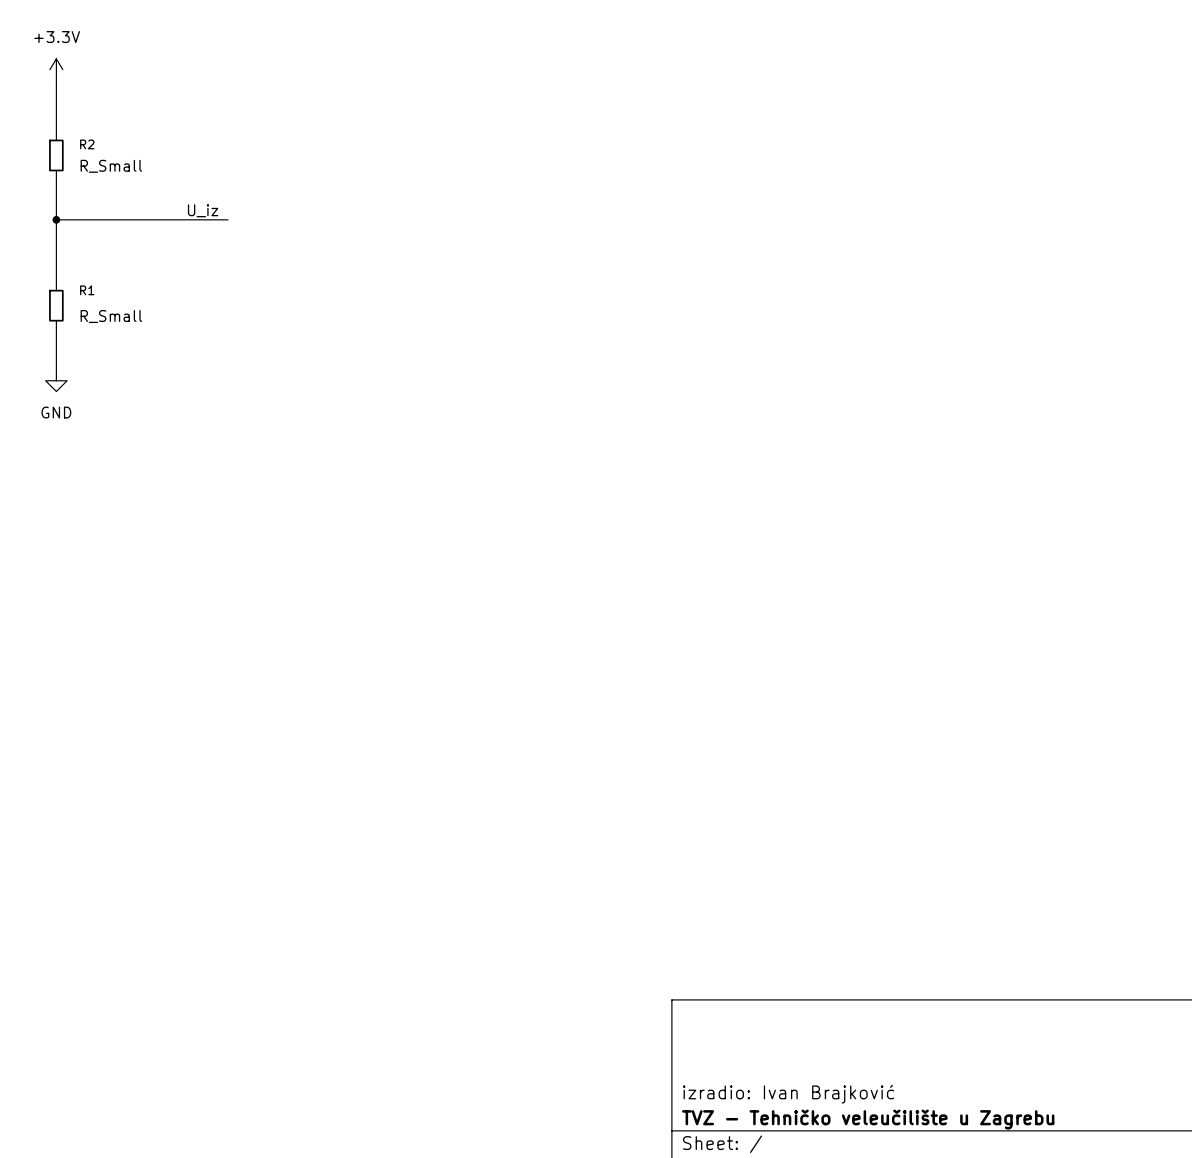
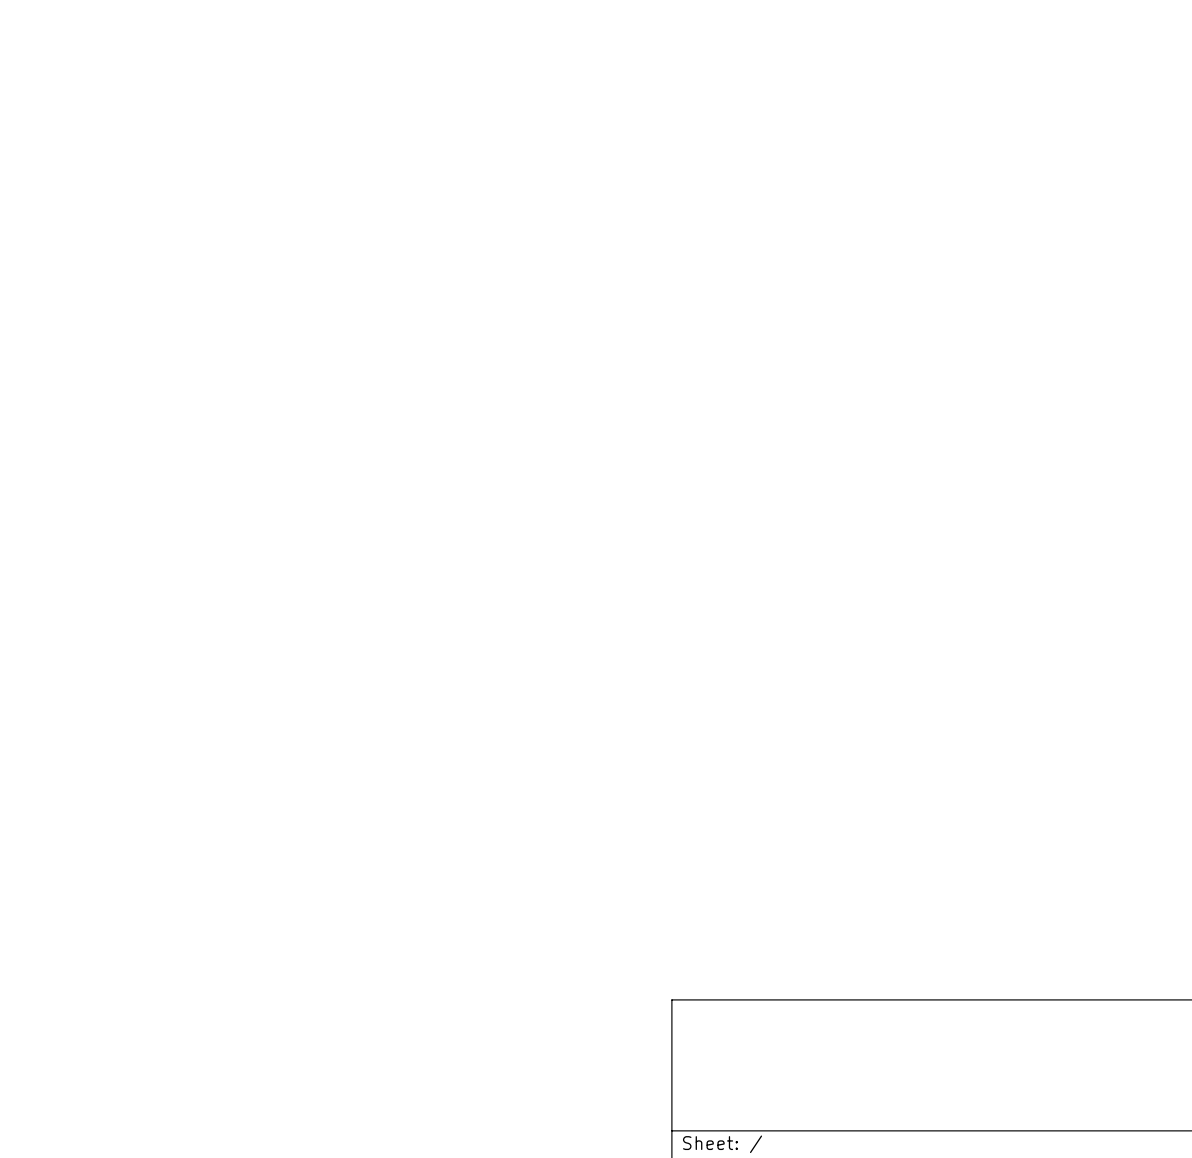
power symbol: +3.3V (56, 69) -> none
wire: (56, 80) (56, 134) -> none
R2: R_Small (56, 155) -> none
wire: (56, 176) (56, 284) -> none
label: U_iz (203, 210) -> none
wire: (56, 219) (228, 219) -> none
junction: (56, 219) -> none
R1: R_Small (56, 305) -> none
wire: (56, 327) (56, 370) -> none
power symbol: GND (56, 380) -> none
title block: izradio: Ivan Brajković (788, 1094) -> none
title block: TVZ - Tehničko veleučilište u Zagrebu (868, 1119) -> none

